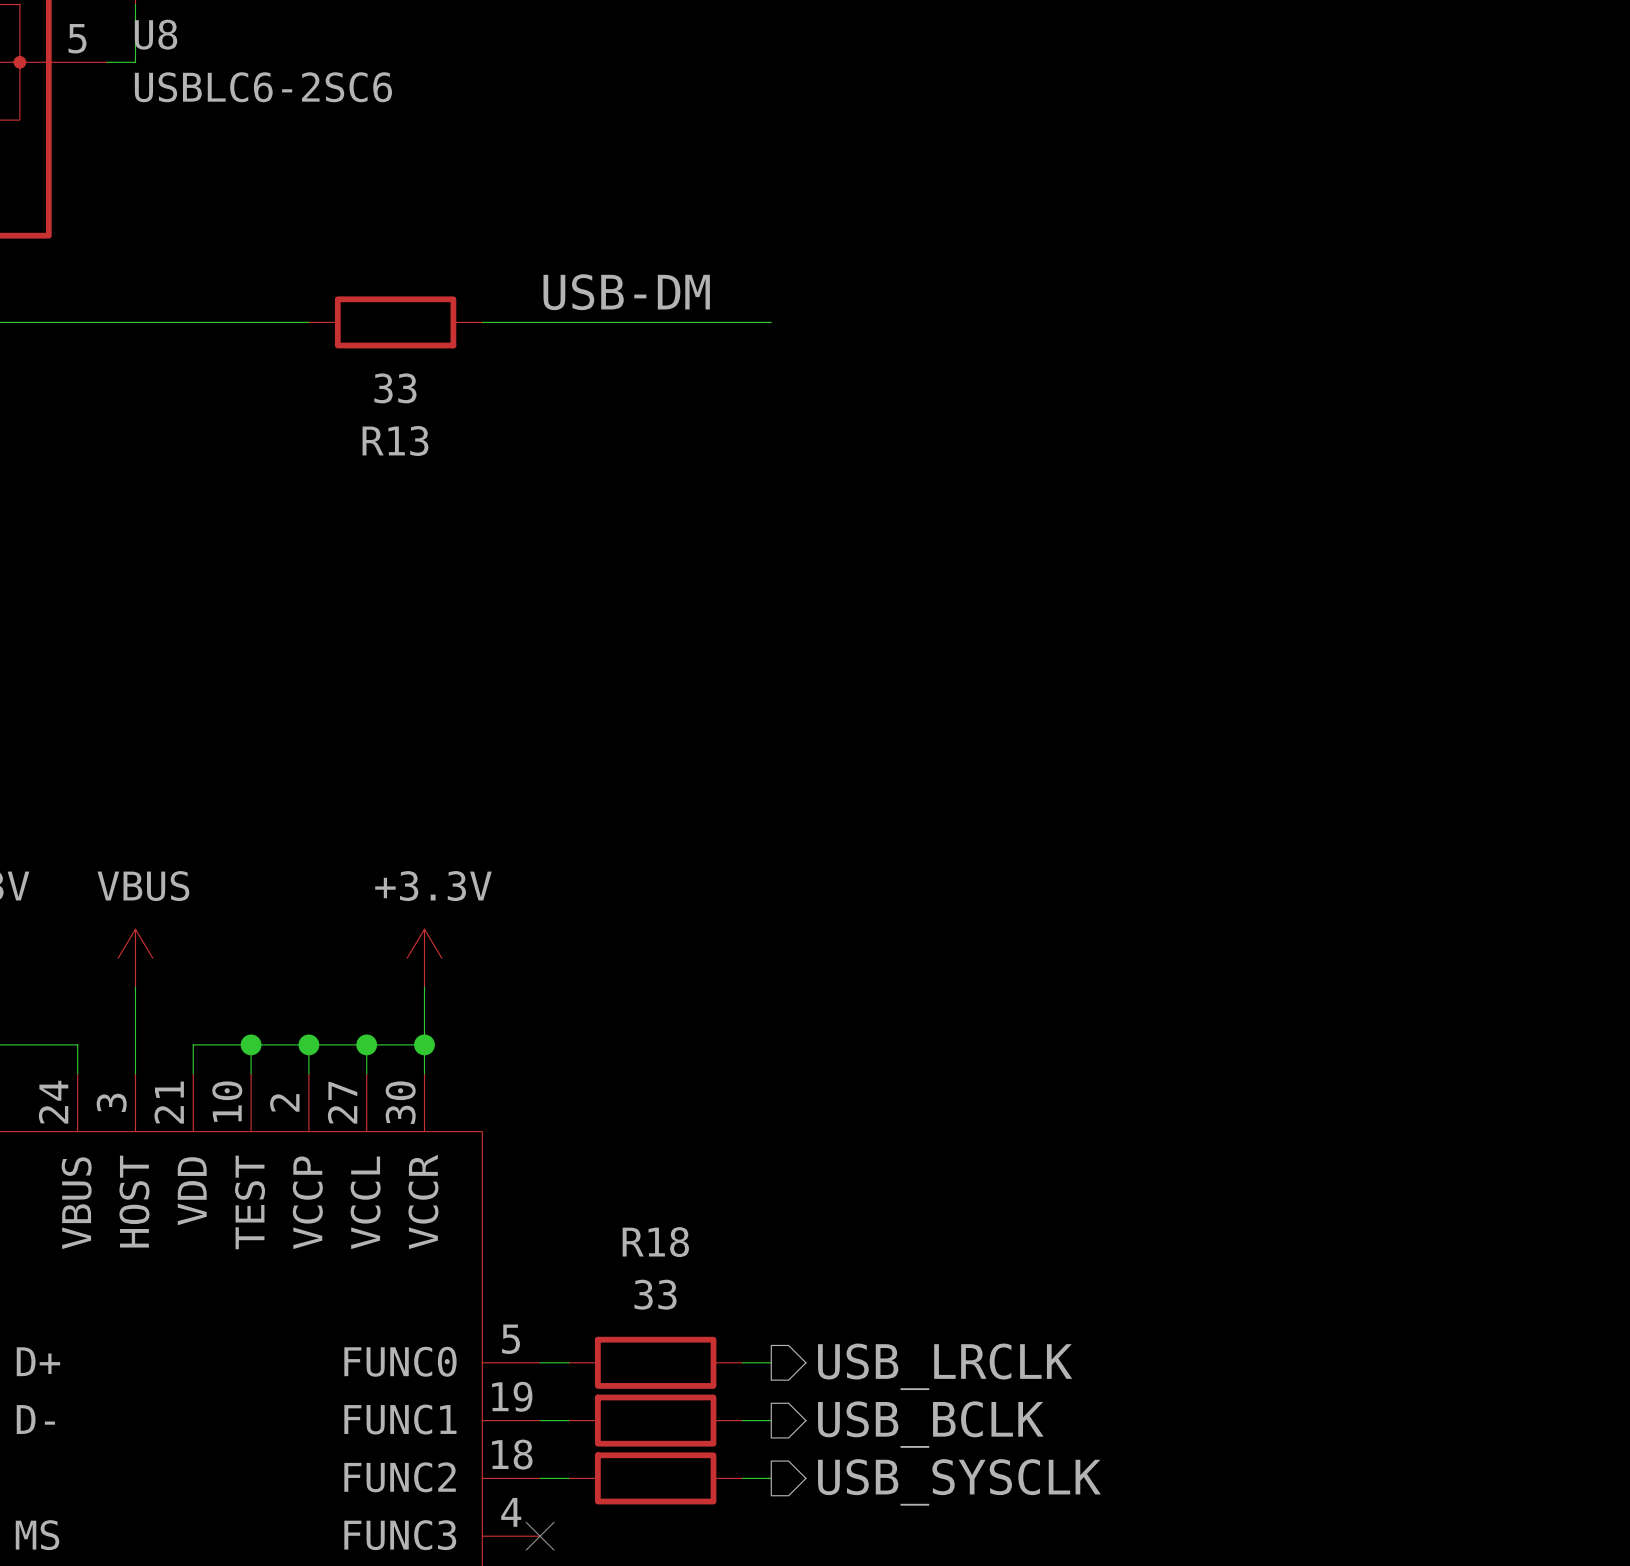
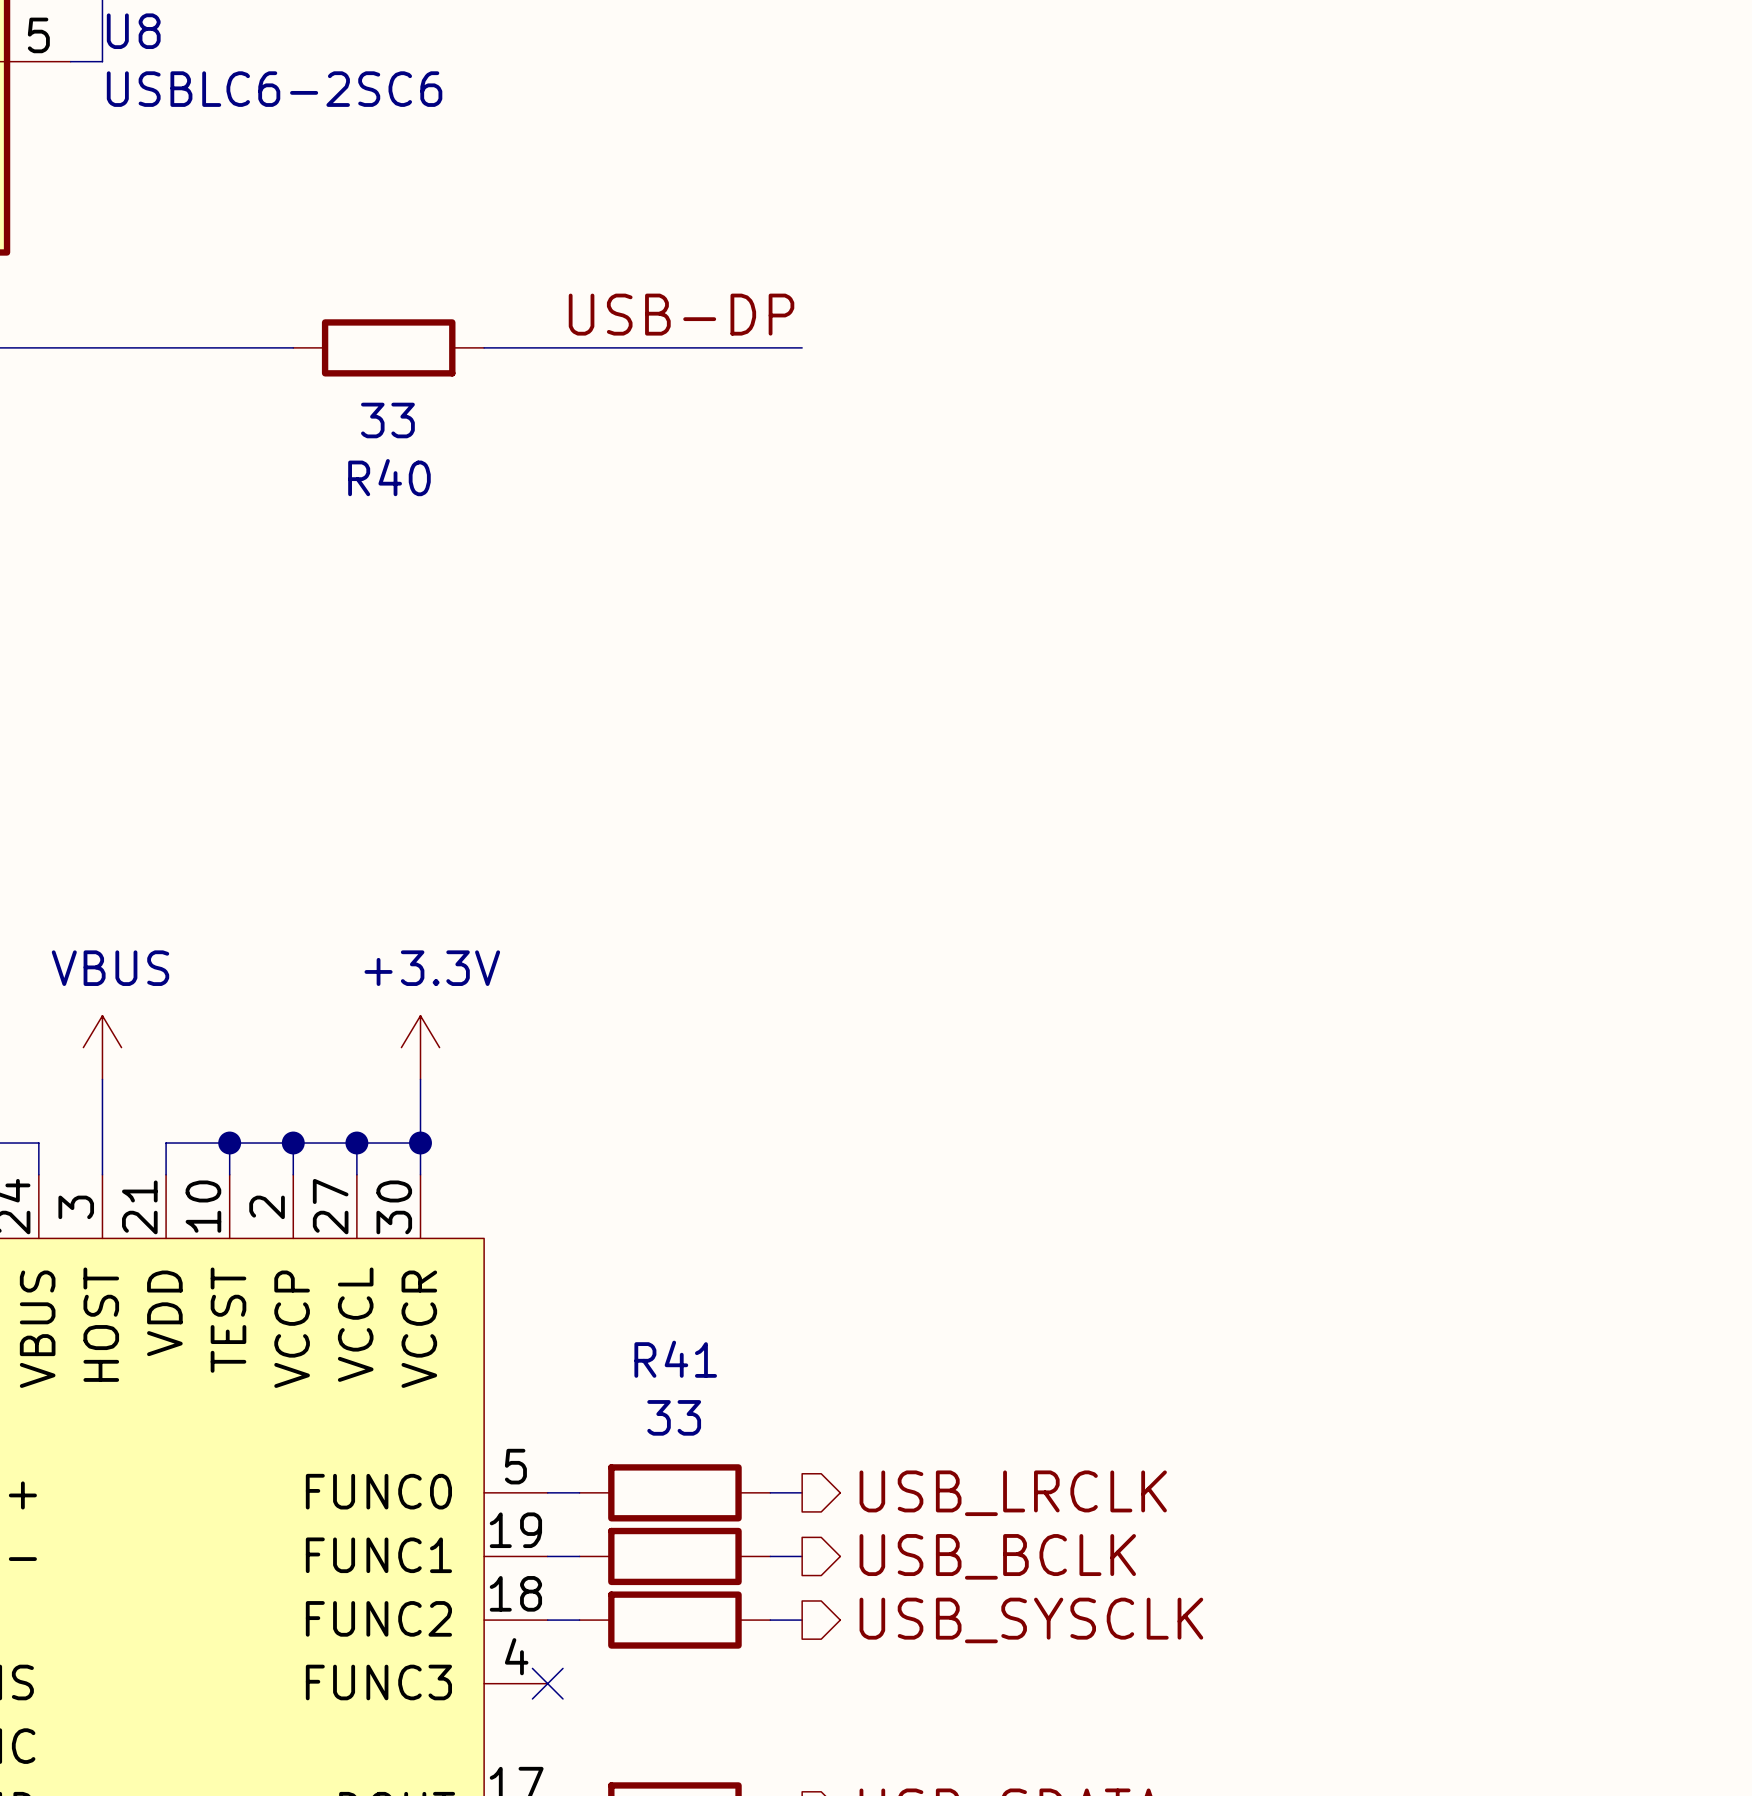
label: USB-DM (626, 292) -> USB-DP (681, 314)
R13 name: R13 (395, 440) -> R40 (389, 477)
R18 name: R18 (655, 1242) -> R41 (675, 1359)

